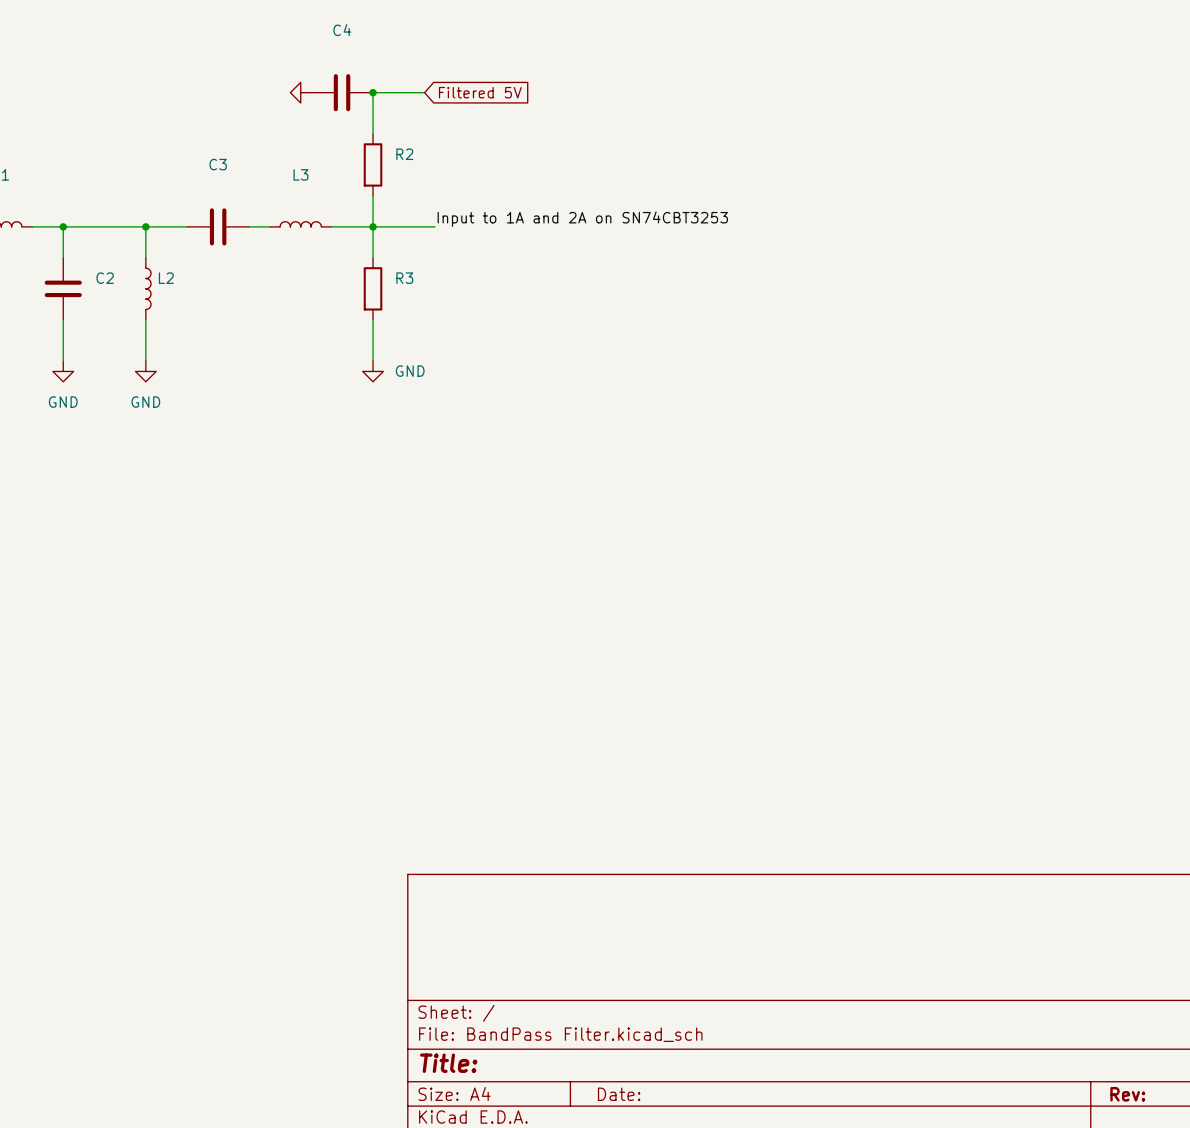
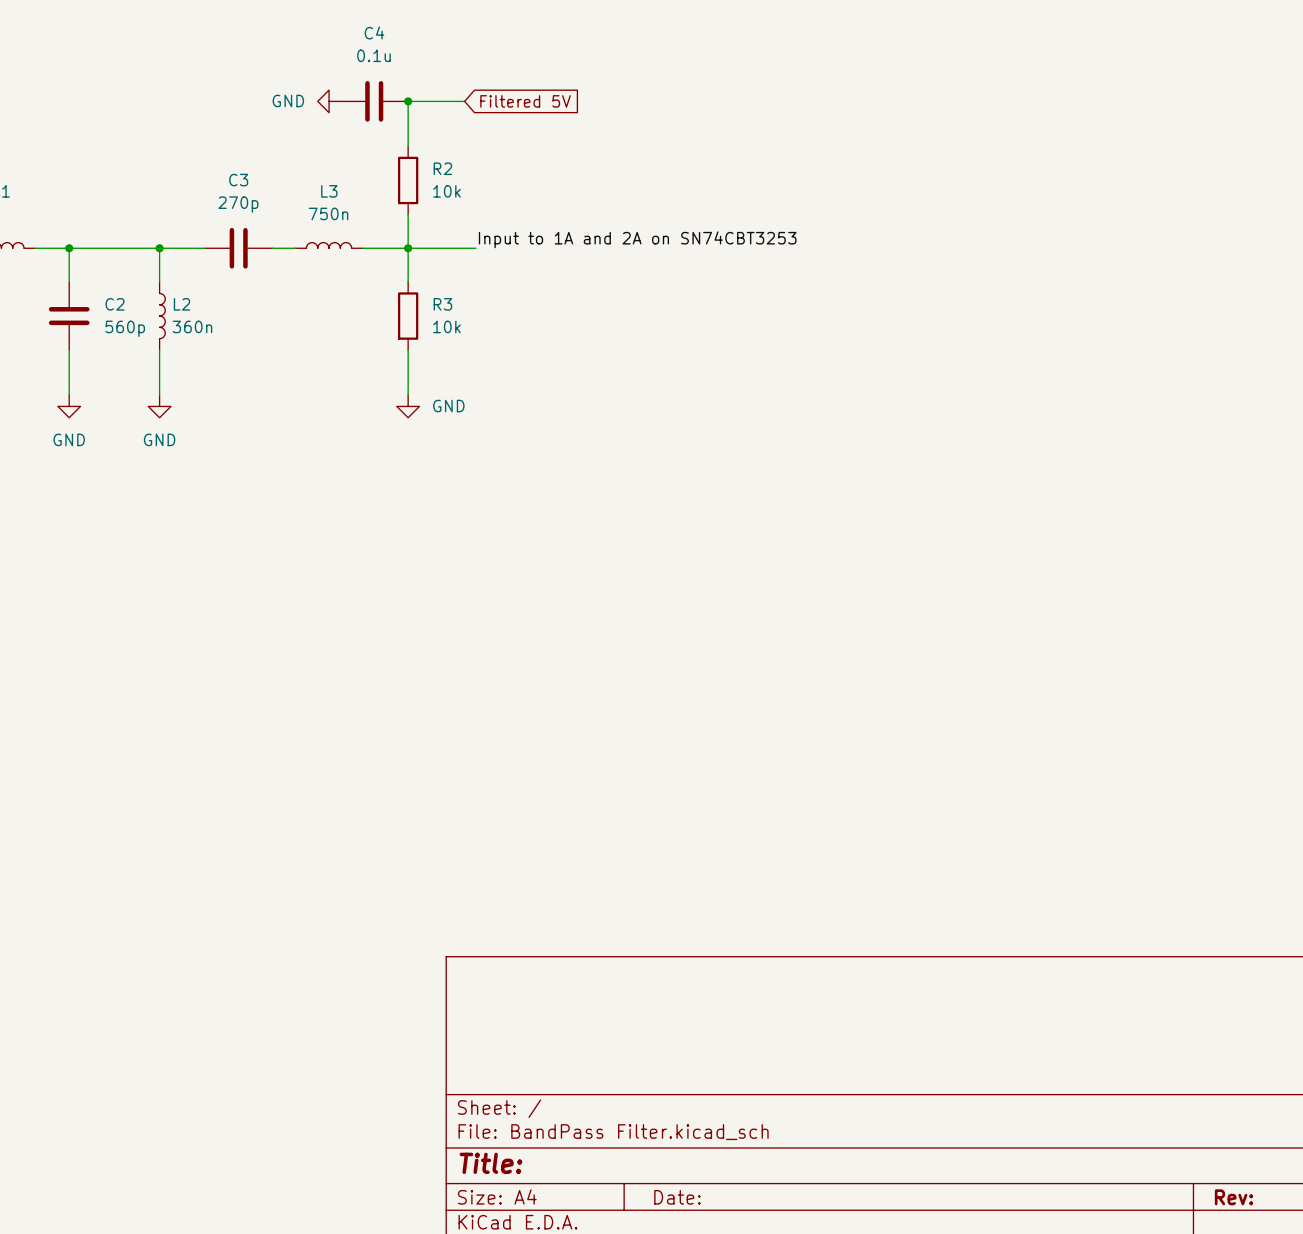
C4 value: none -> 0.1u (373, 55)
power symbol text: none -> GND (288, 100)
R2 value: none -> 10k (446, 191)
C3 value: none -> 270p (238, 204)
L3 value: none -> 750n (328, 213)
L2 value: none -> 360n (192, 326)
R3 value: none -> 10k (446, 326)
C2 value: none -> 560p (125, 328)

